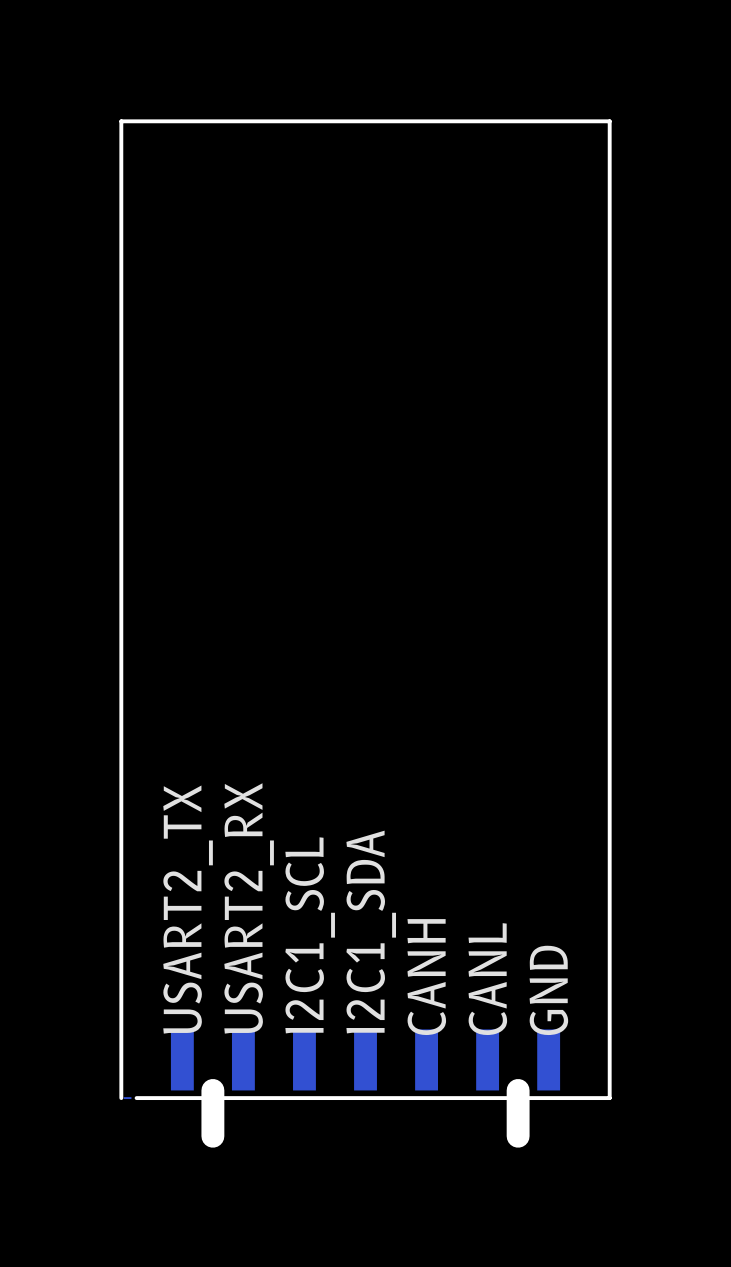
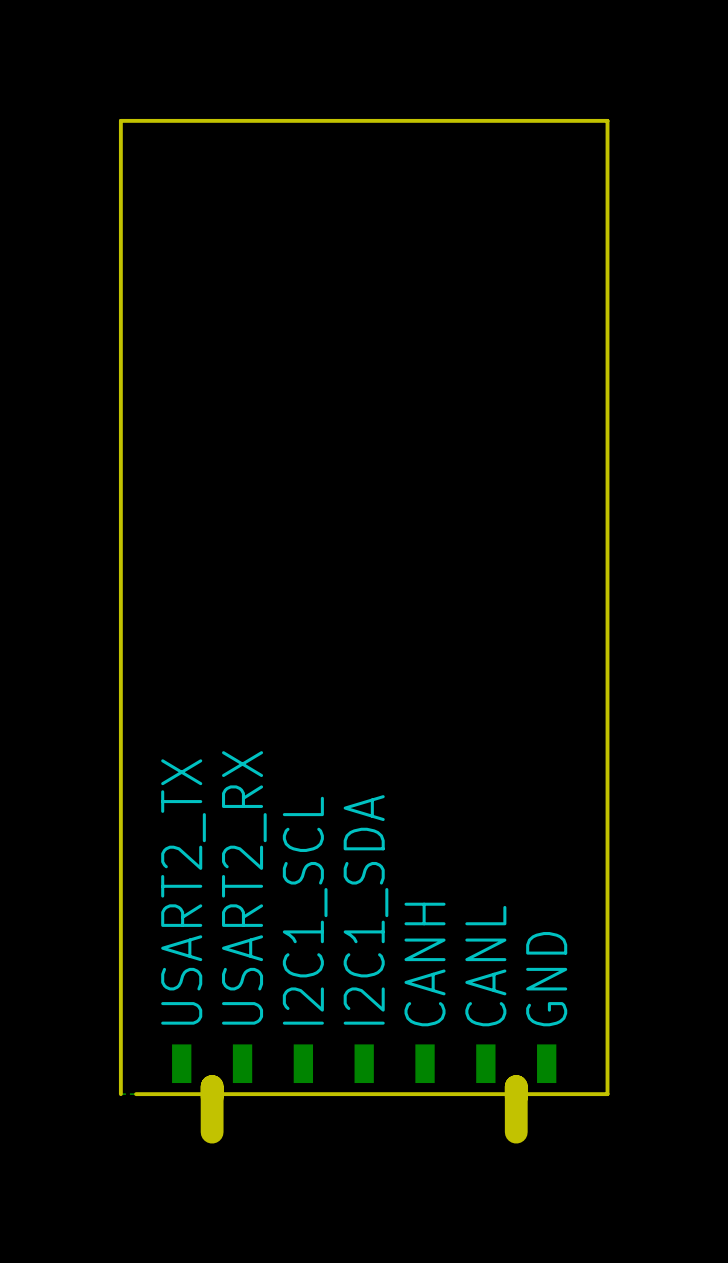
part footprint: [170, 1029, 561, 1091] -> [172, 1044, 557, 1109]

